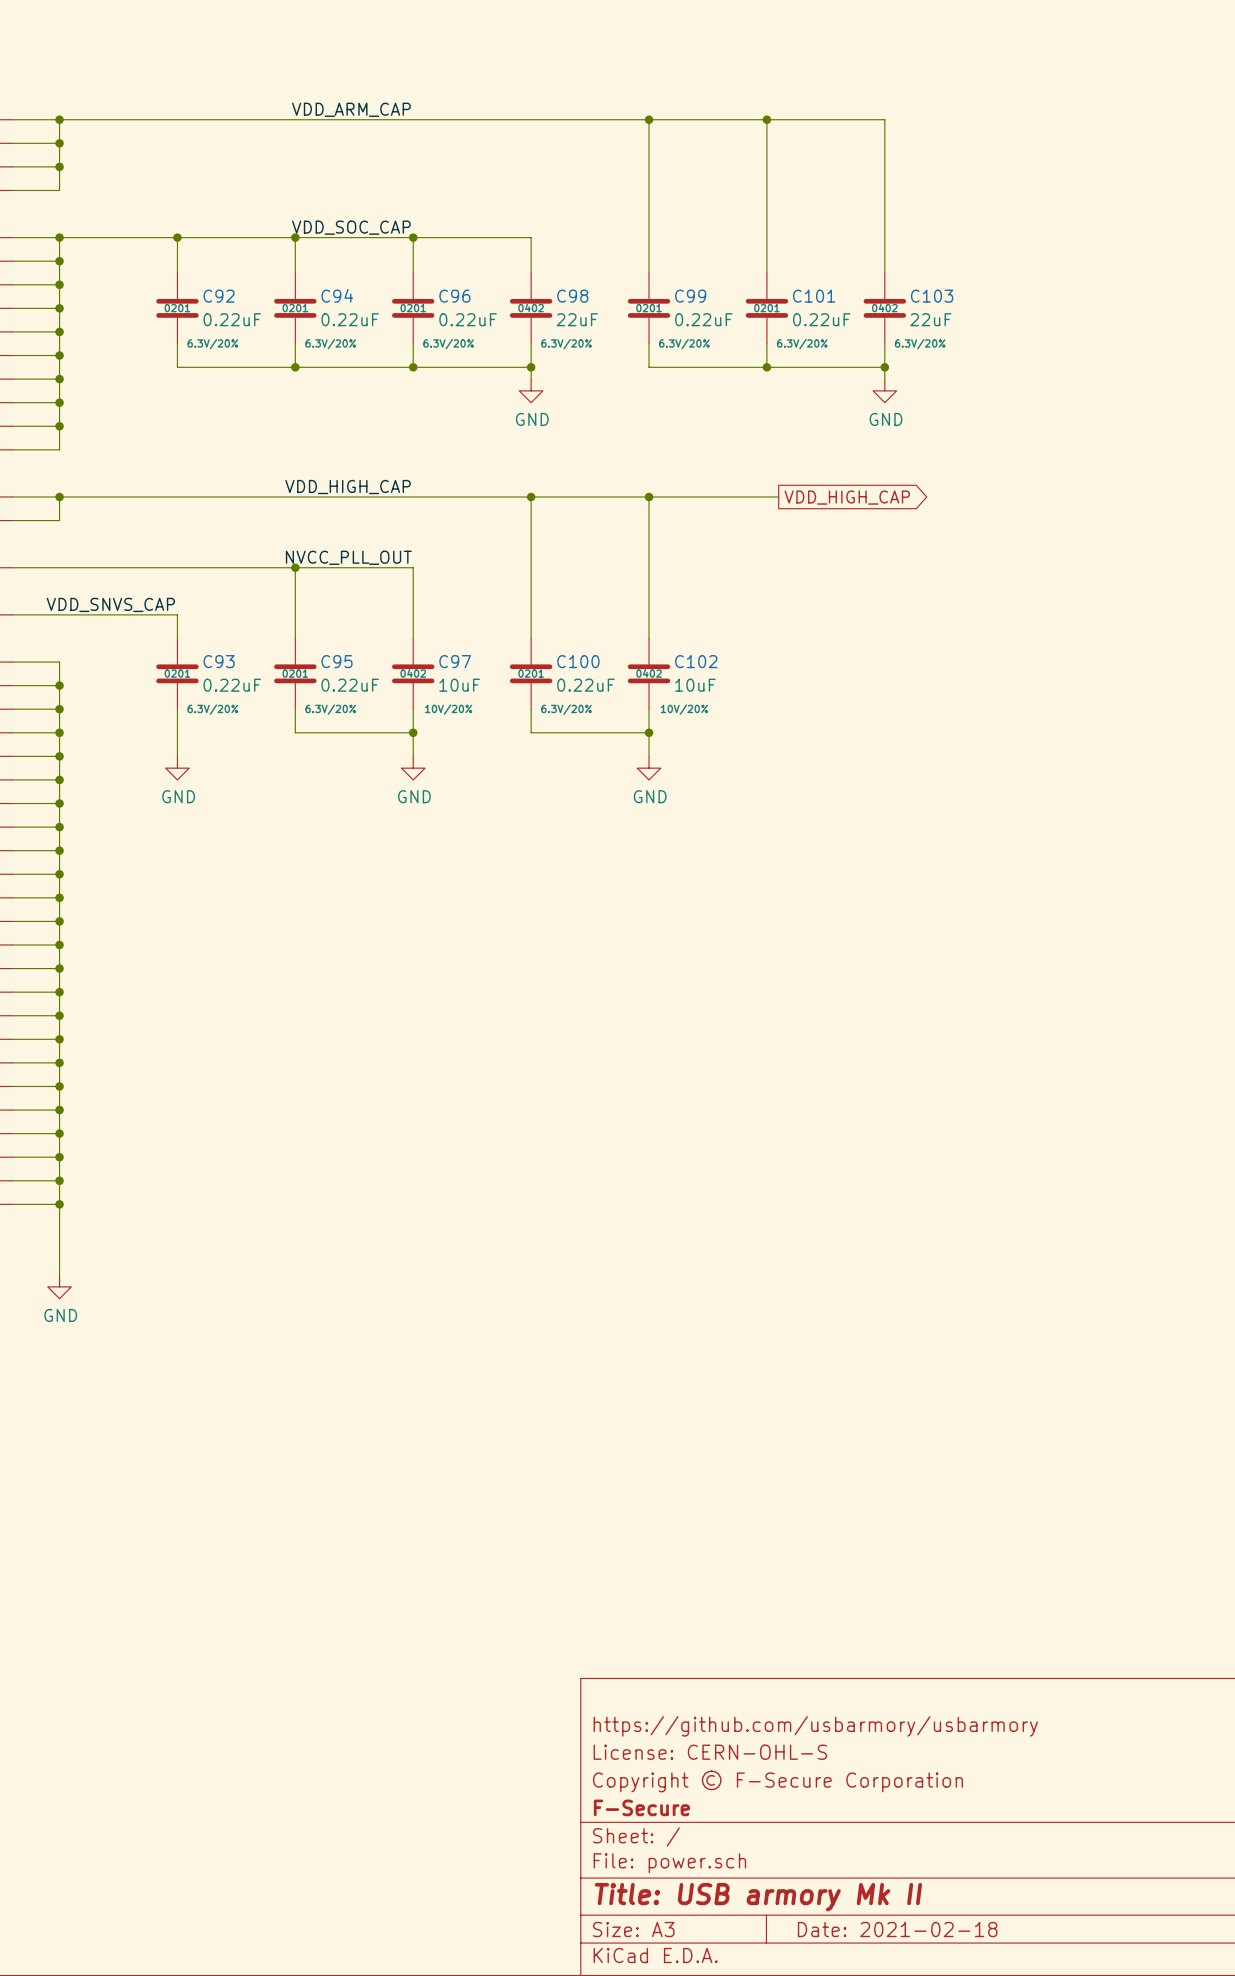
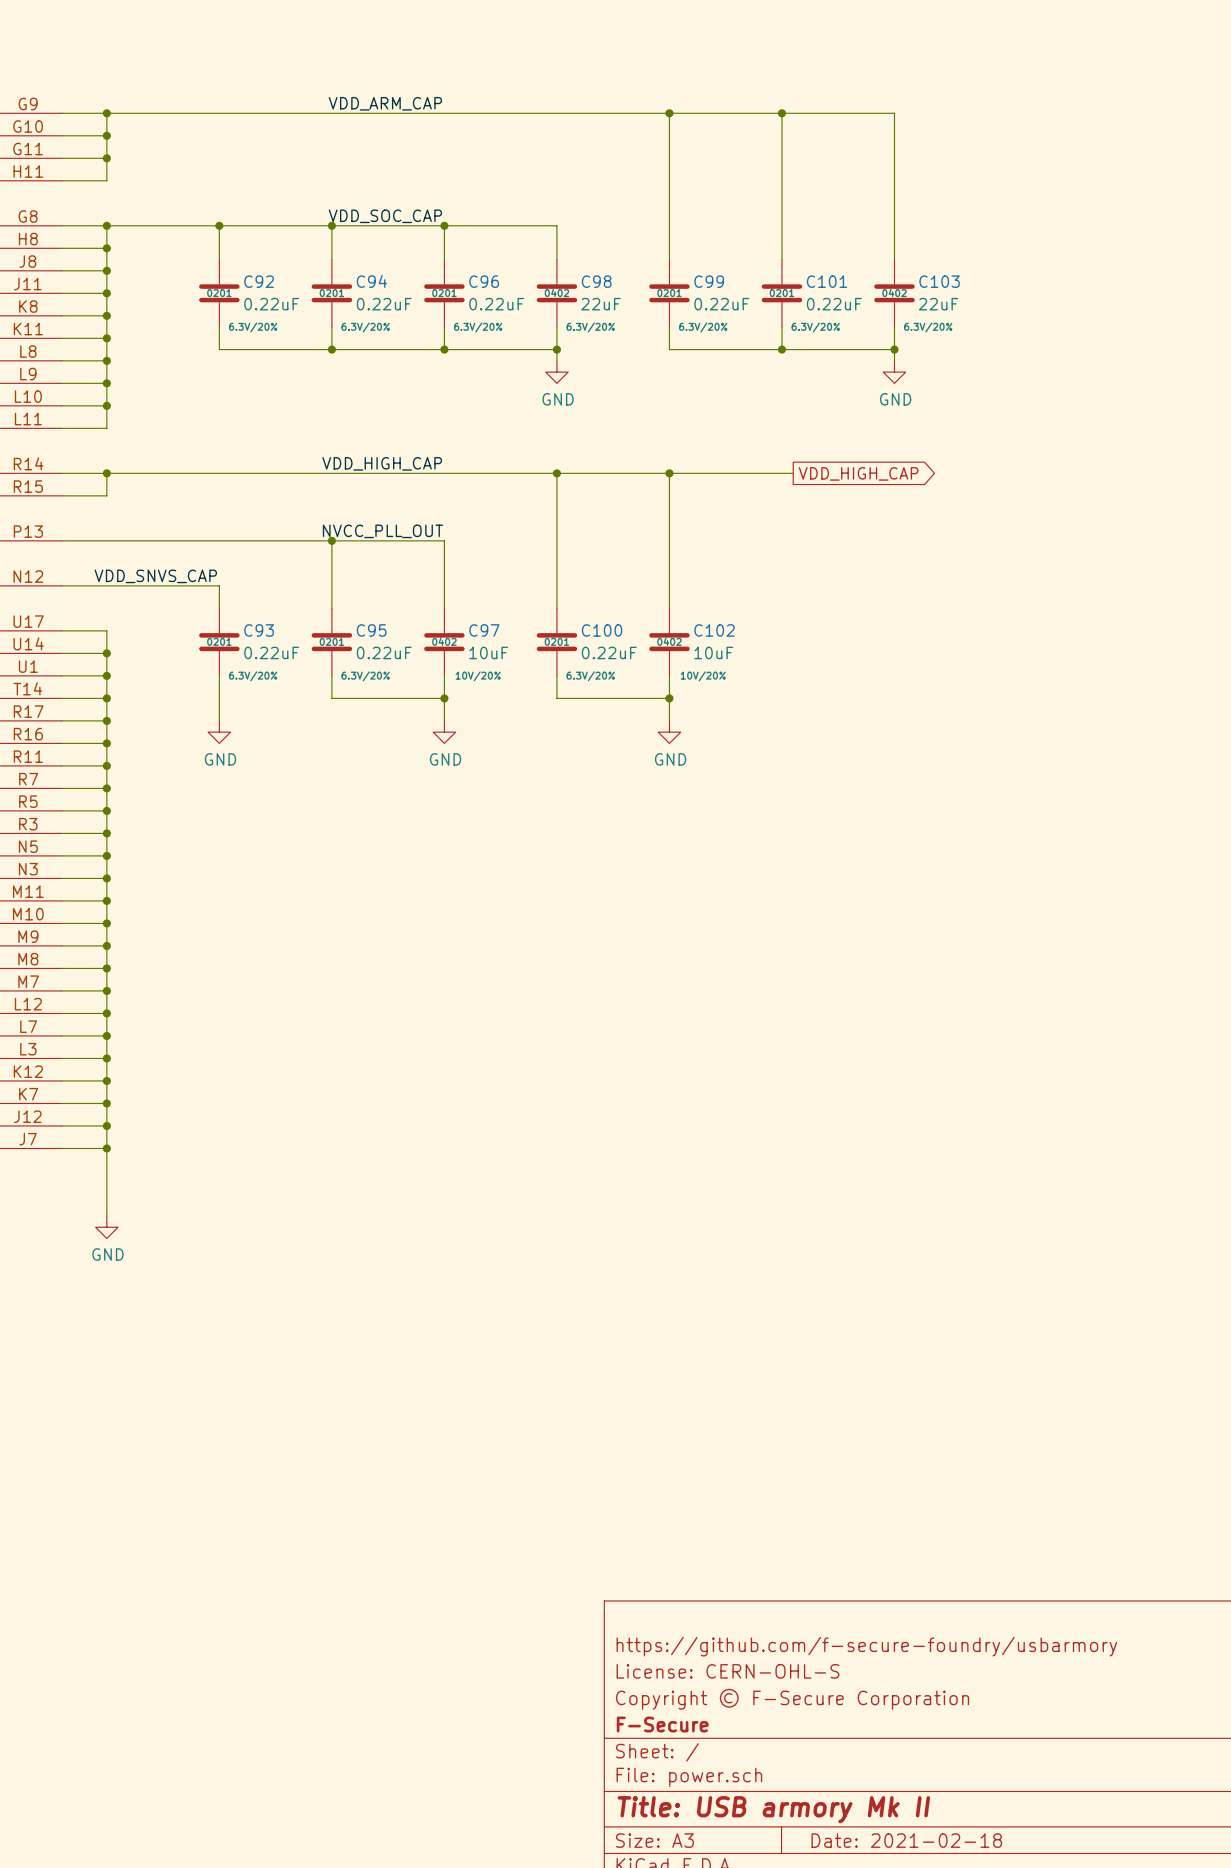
title block: https://github.com/usbarmory/usbarmory (815, 1726) -> https://github.com/f-secure-foundry/usbarmory (866, 1646)

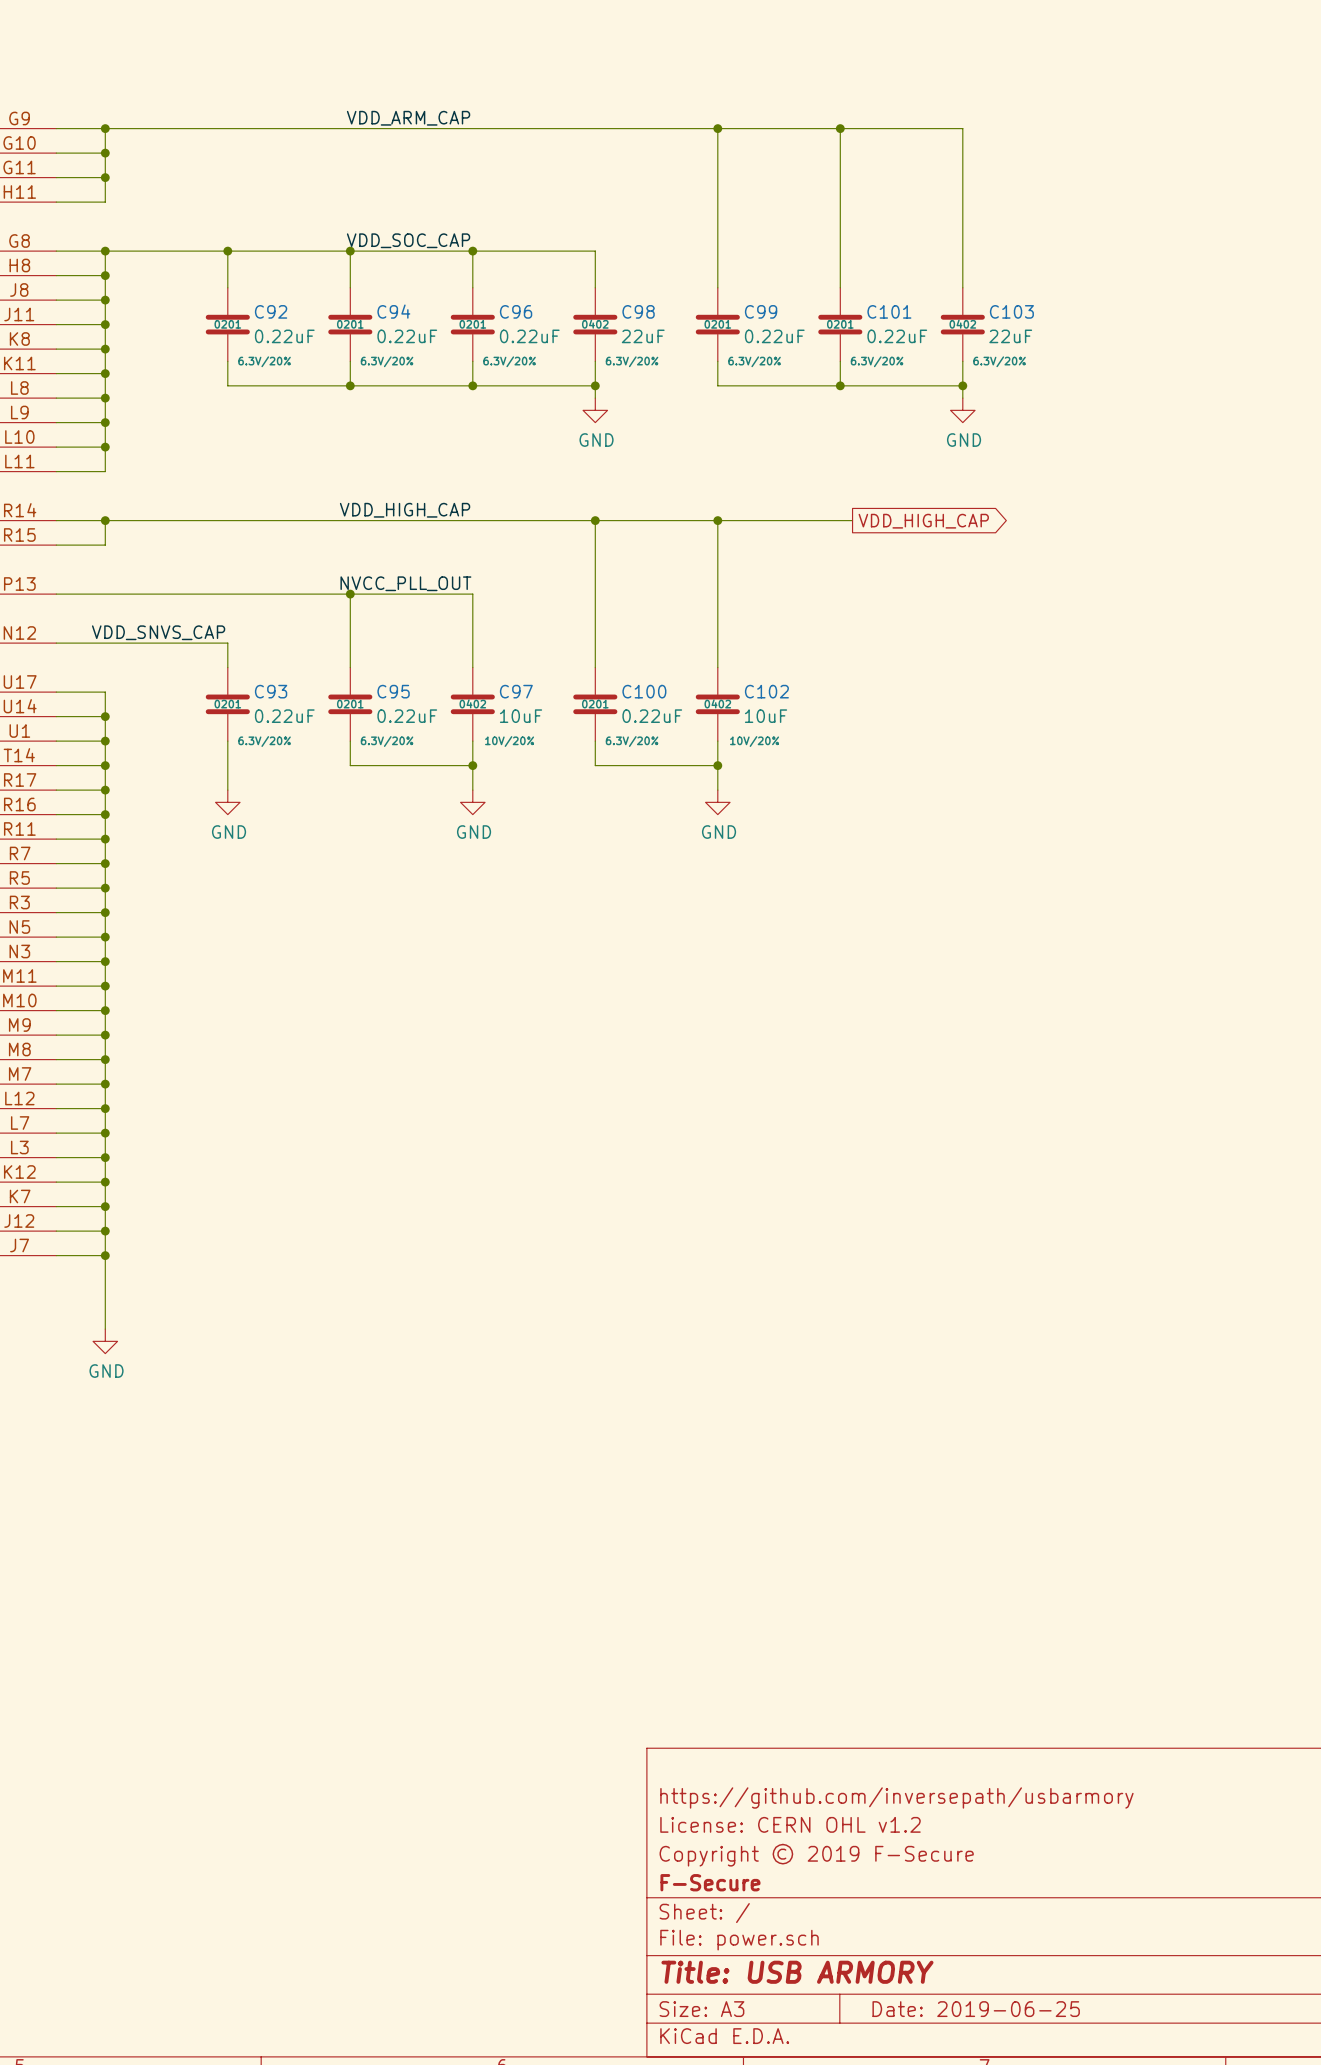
title block: https://github.com/f-secure-foundry/usbarmory (866, 1646) -> https://github.com/inversepath/usbarmory (896, 1797)
title block: License: CERN-OHL-S (727, 1671) -> License: CERN OHL v1.2 (790, 1824)
title block: Copyright © F-Secure Corporation (792, 1699) -> Copyright © 2019 F-Secure (816, 1855)
title block: Title: USB armory Mk II (773, 1809) -> Title: USB ARMORY (797, 1972)
title block: Date: 2021-02-18 (906, 1840) -> Date: 2019-06-25 (976, 2009)

